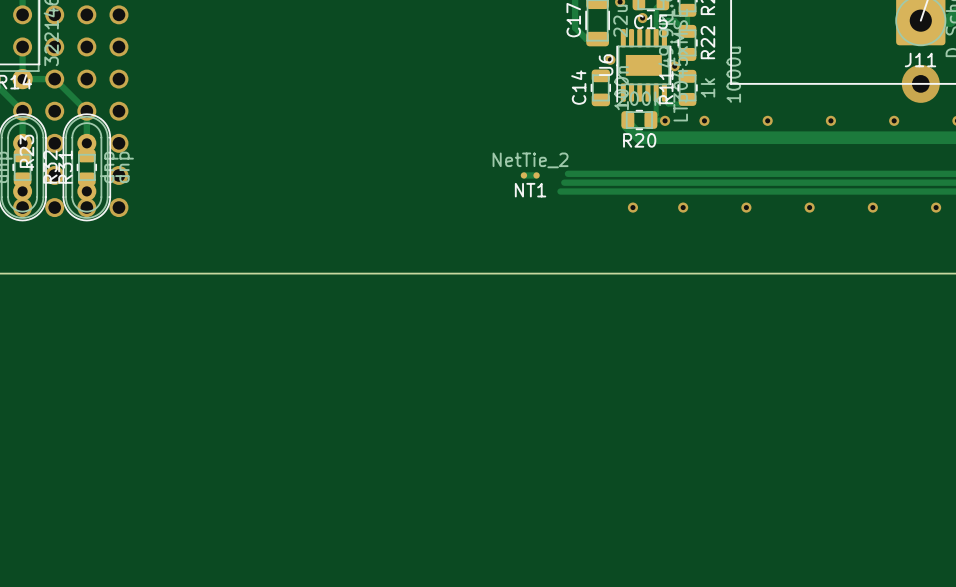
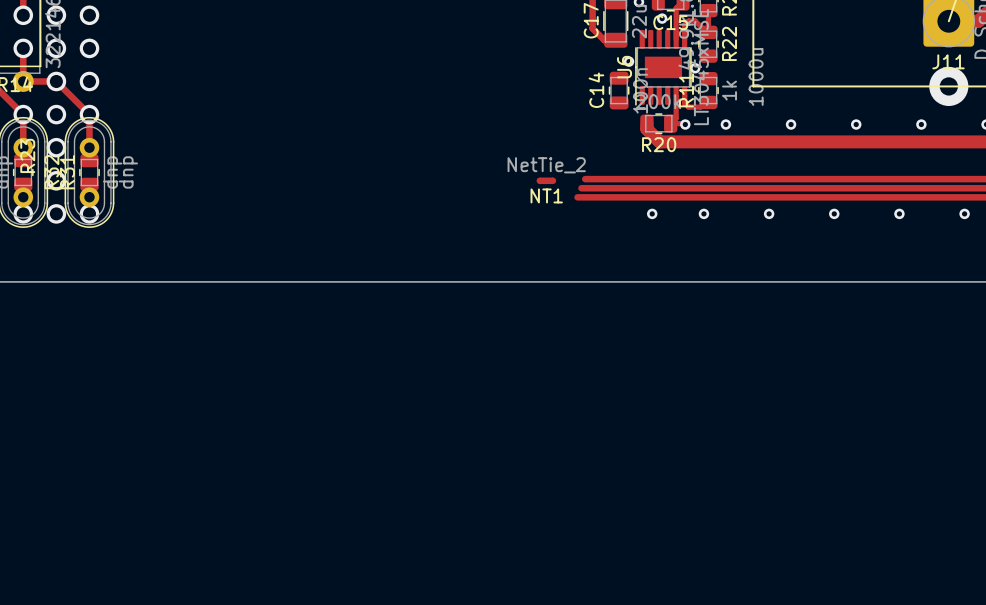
via: (118, 14) -> none
via: (118, 46) -> none
via: (118, 79) -> none
via: (118, 111) -> none
via: (118, 143) -> none
via: (118, 175) -> none
via: (118, 207) -> none

